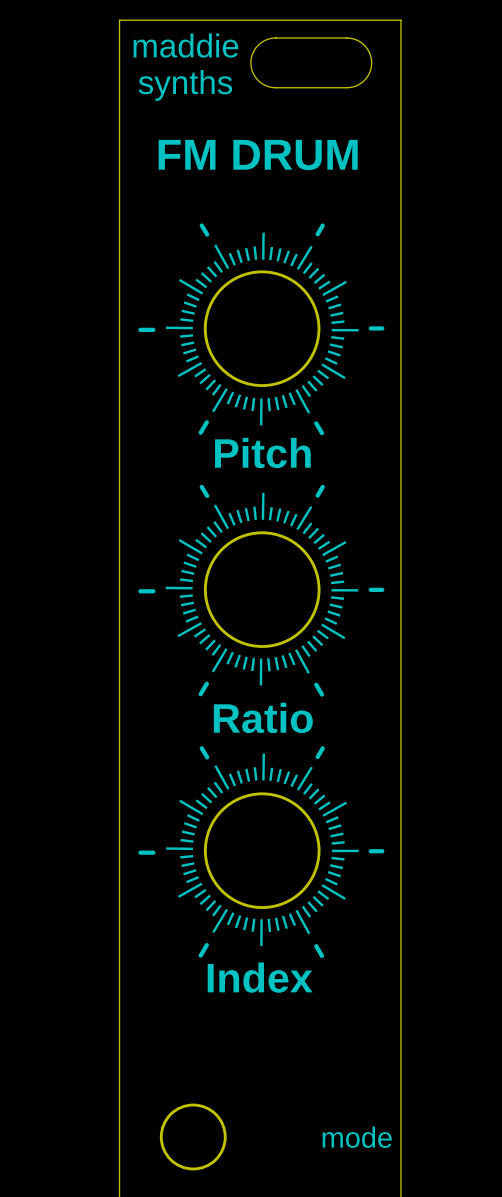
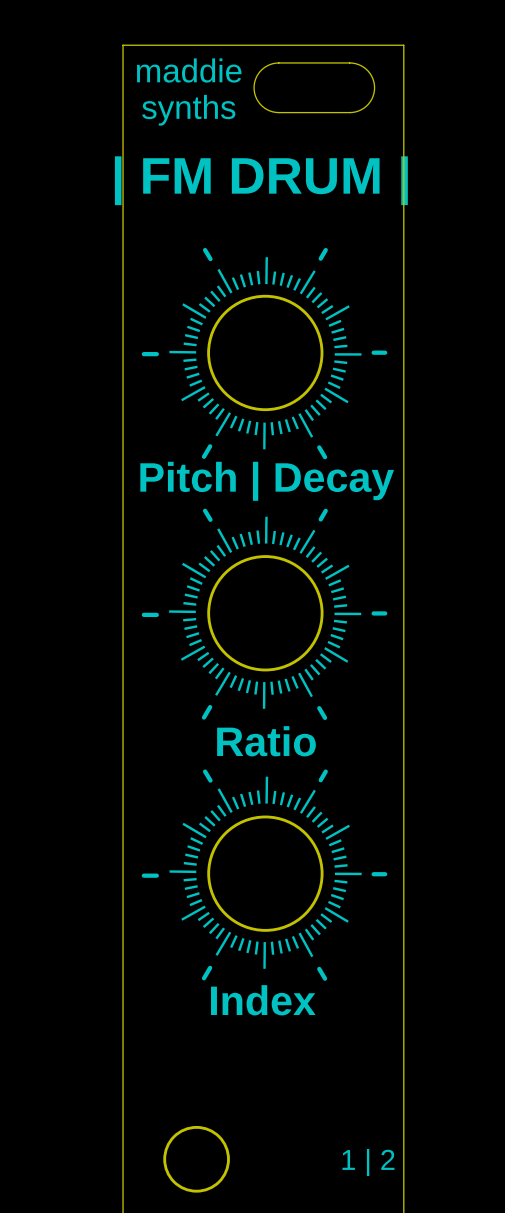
text: FM DRUM (258, 155) -> | FM DRUM | (261, 180)
text: Pitch (262, 452) -> Pitch | Decay (267, 481)
text: mode (357, 1137) -> 1 | 2 (368, 1162)

